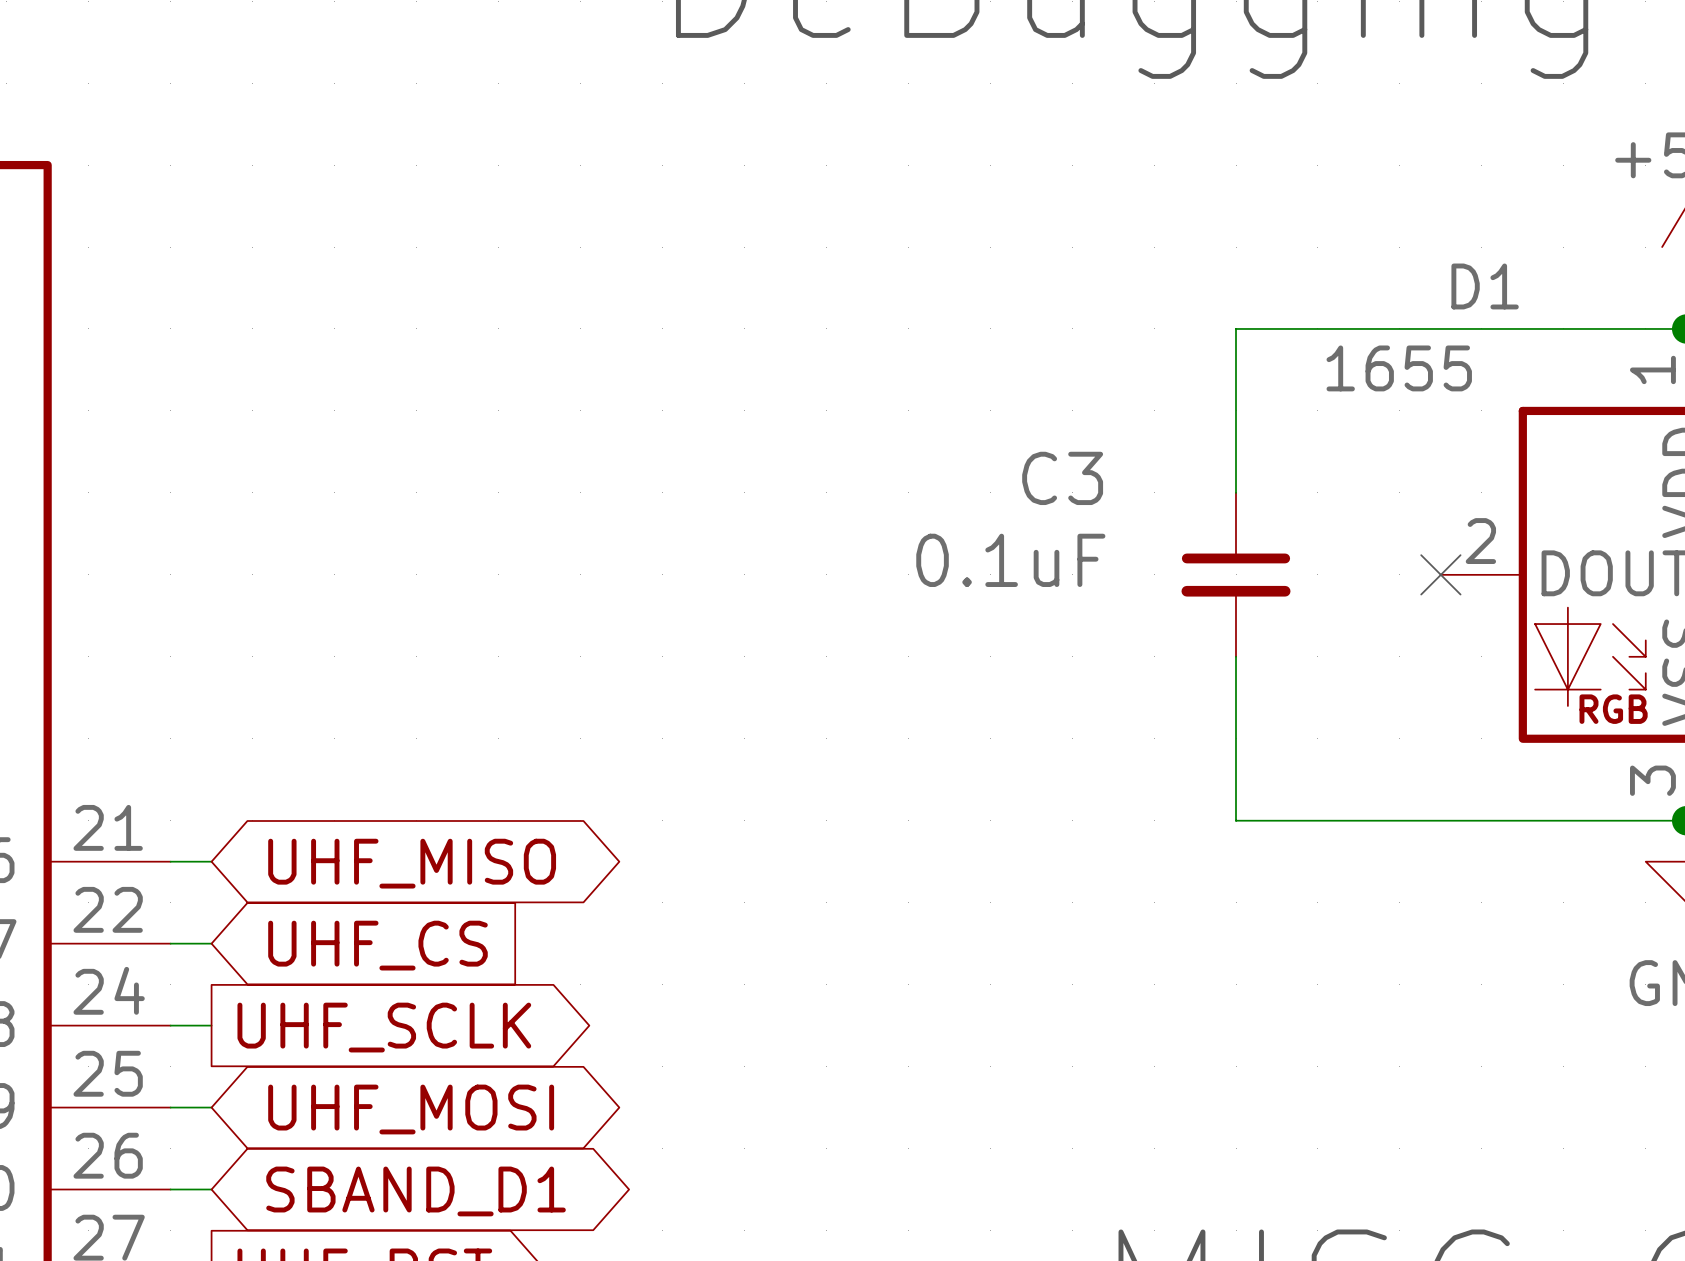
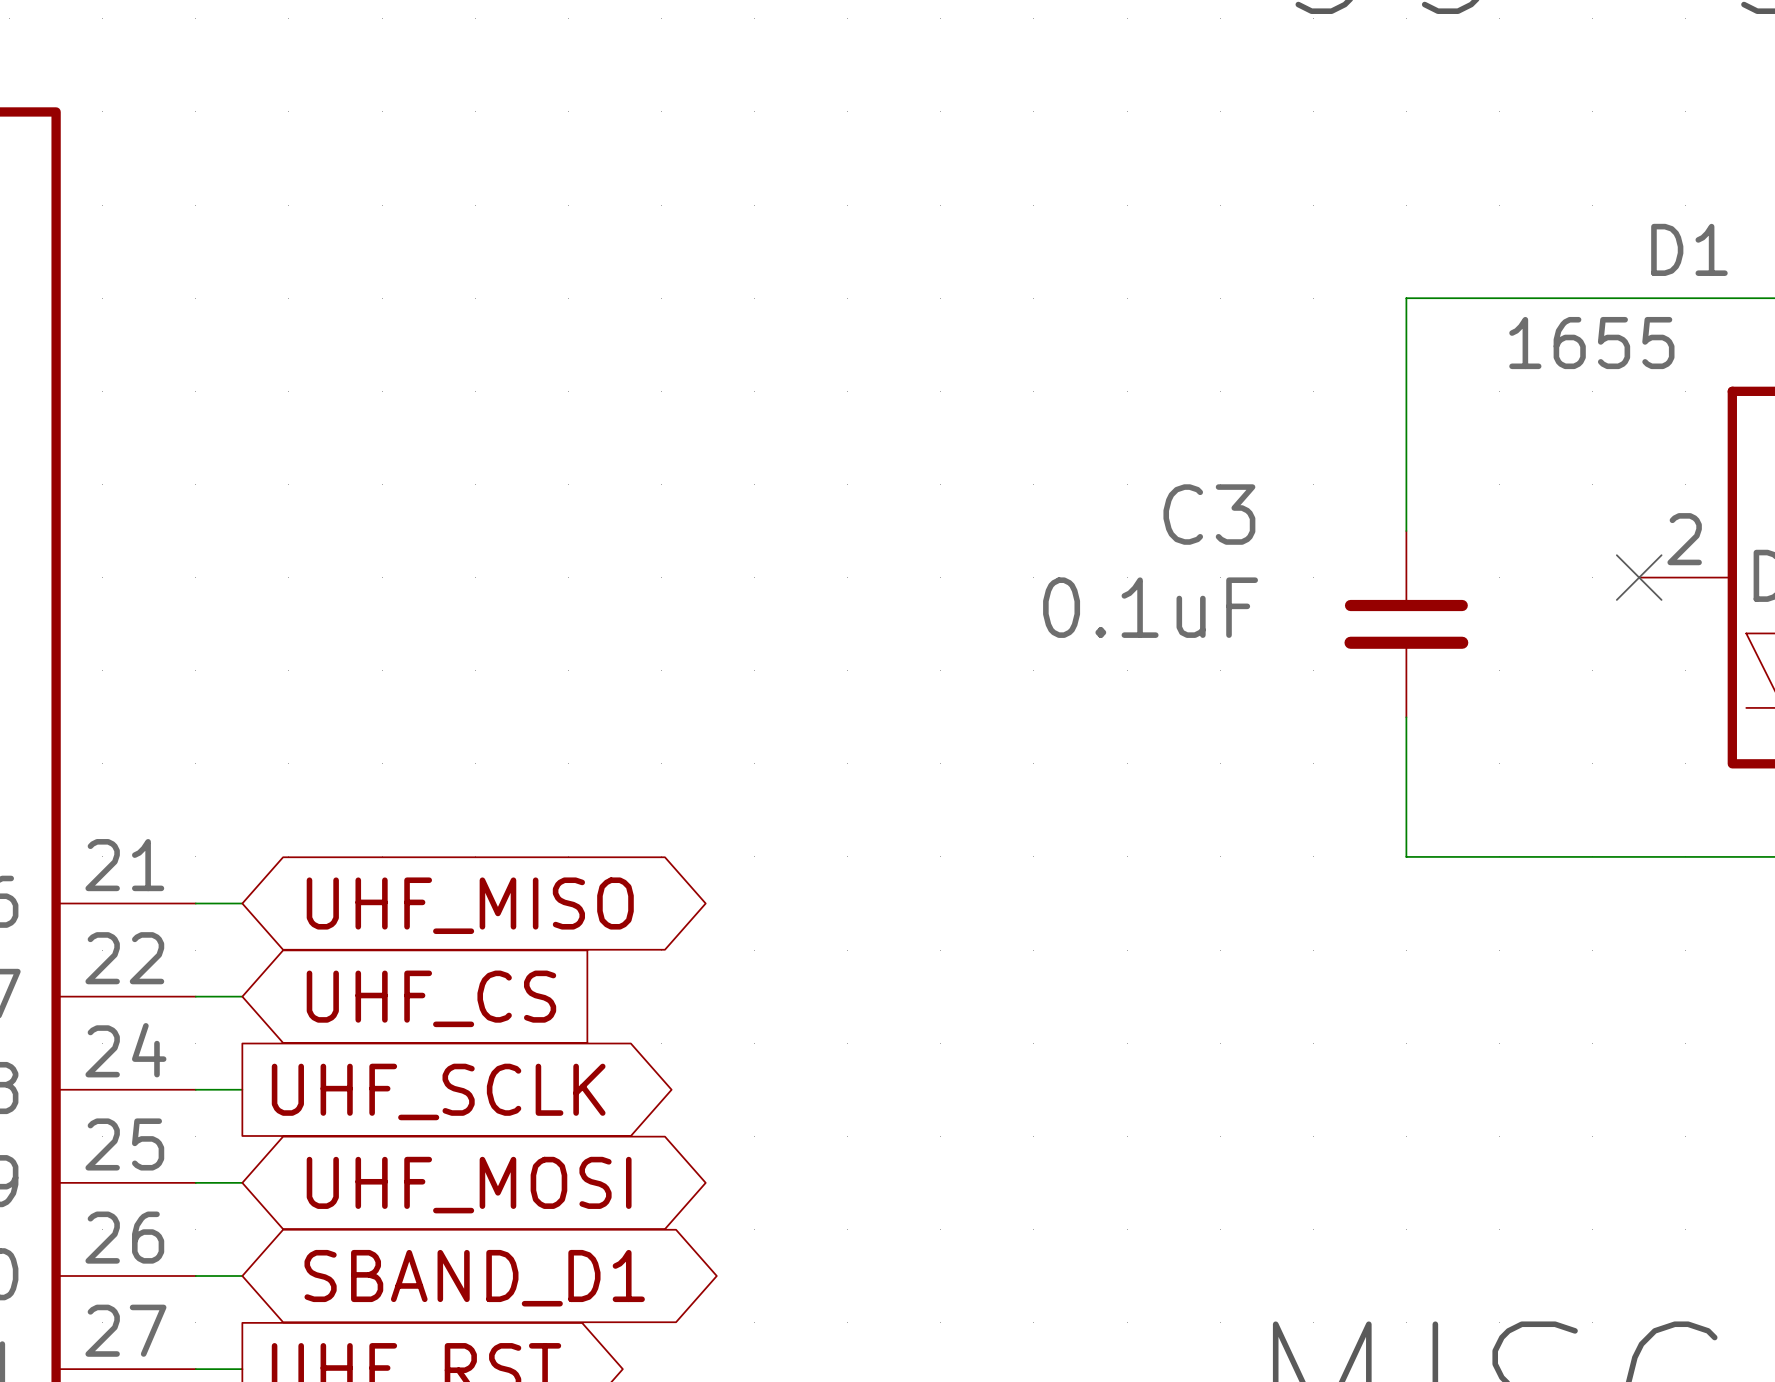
C3 position: (1236, 574) -> (1406, 624)

